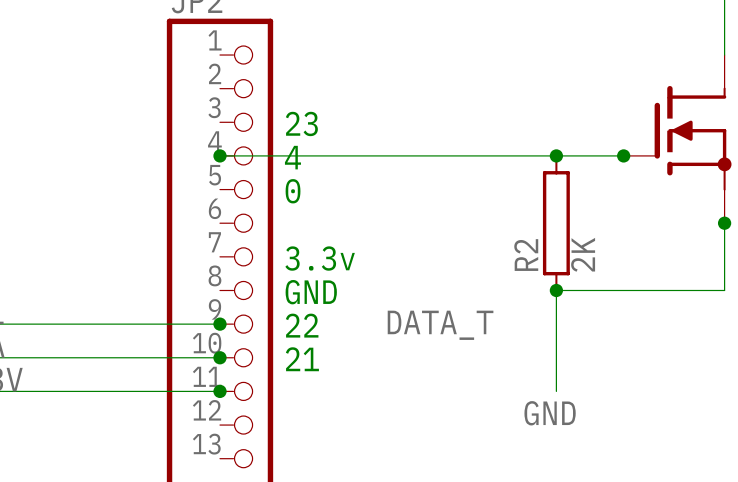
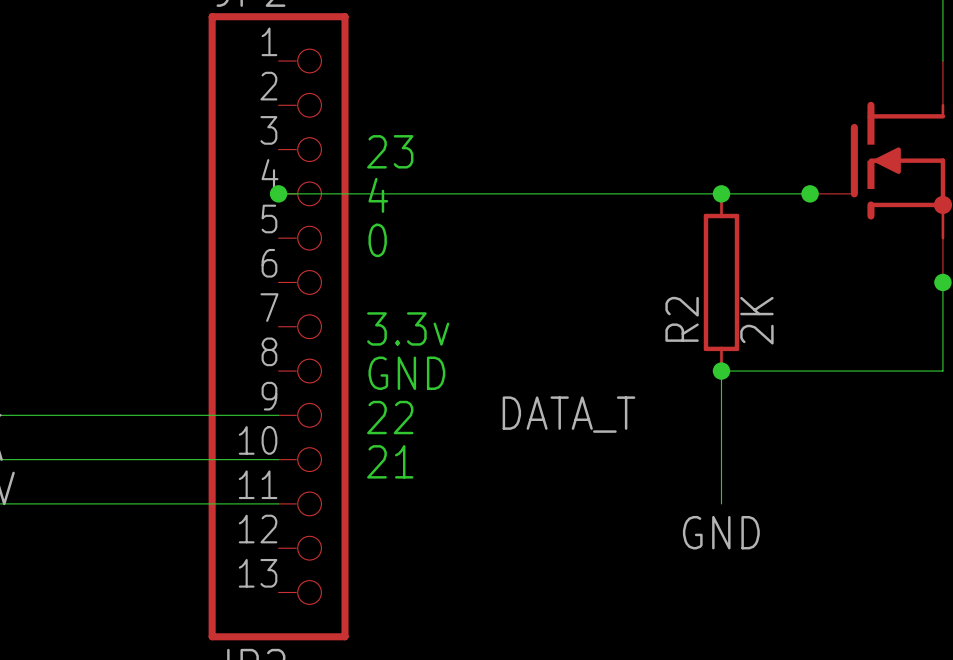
junction: (220, 324) -> none
junction: (220, 357) -> none
junction: (220, 391) -> none

